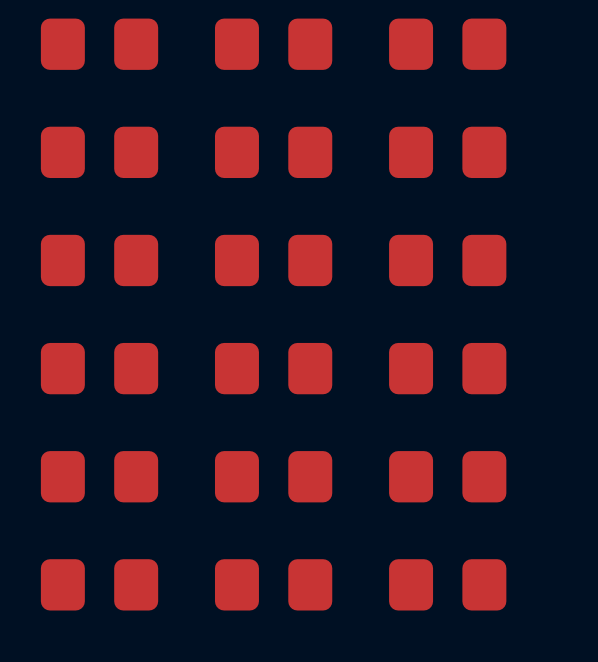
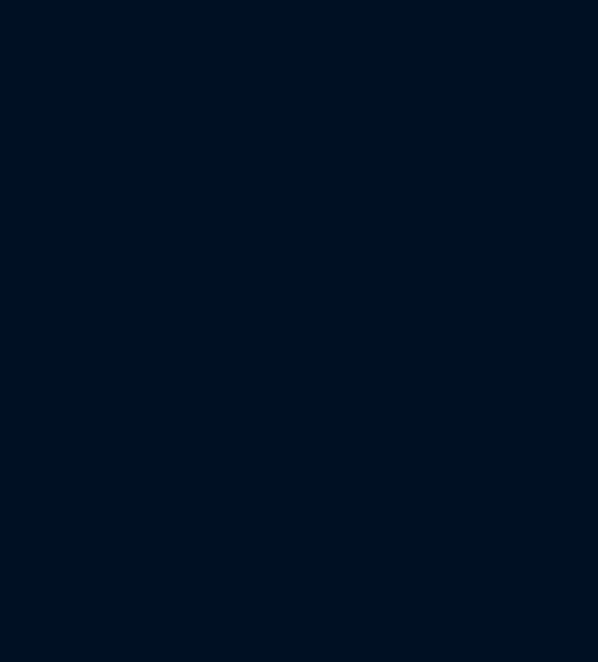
part: (99, 44) -> none
part: (273, 44) -> none
part: (447, 44) -> none
part: (99, 152) -> none
part: (273, 152) -> none
part: (447, 152) -> none
part: (99, 260) -> none
part: (273, 260) -> none
part: (447, 260) -> none
part: (99, 368) -> none
part: (273, 368) -> none
part: (447, 368) -> none
part: (99, 476) -> none
part: (273, 476) -> none
part: (447, 476) -> none
part: (99, 584) -> none
part: (273, 584) -> none
part: (447, 584) -> none

